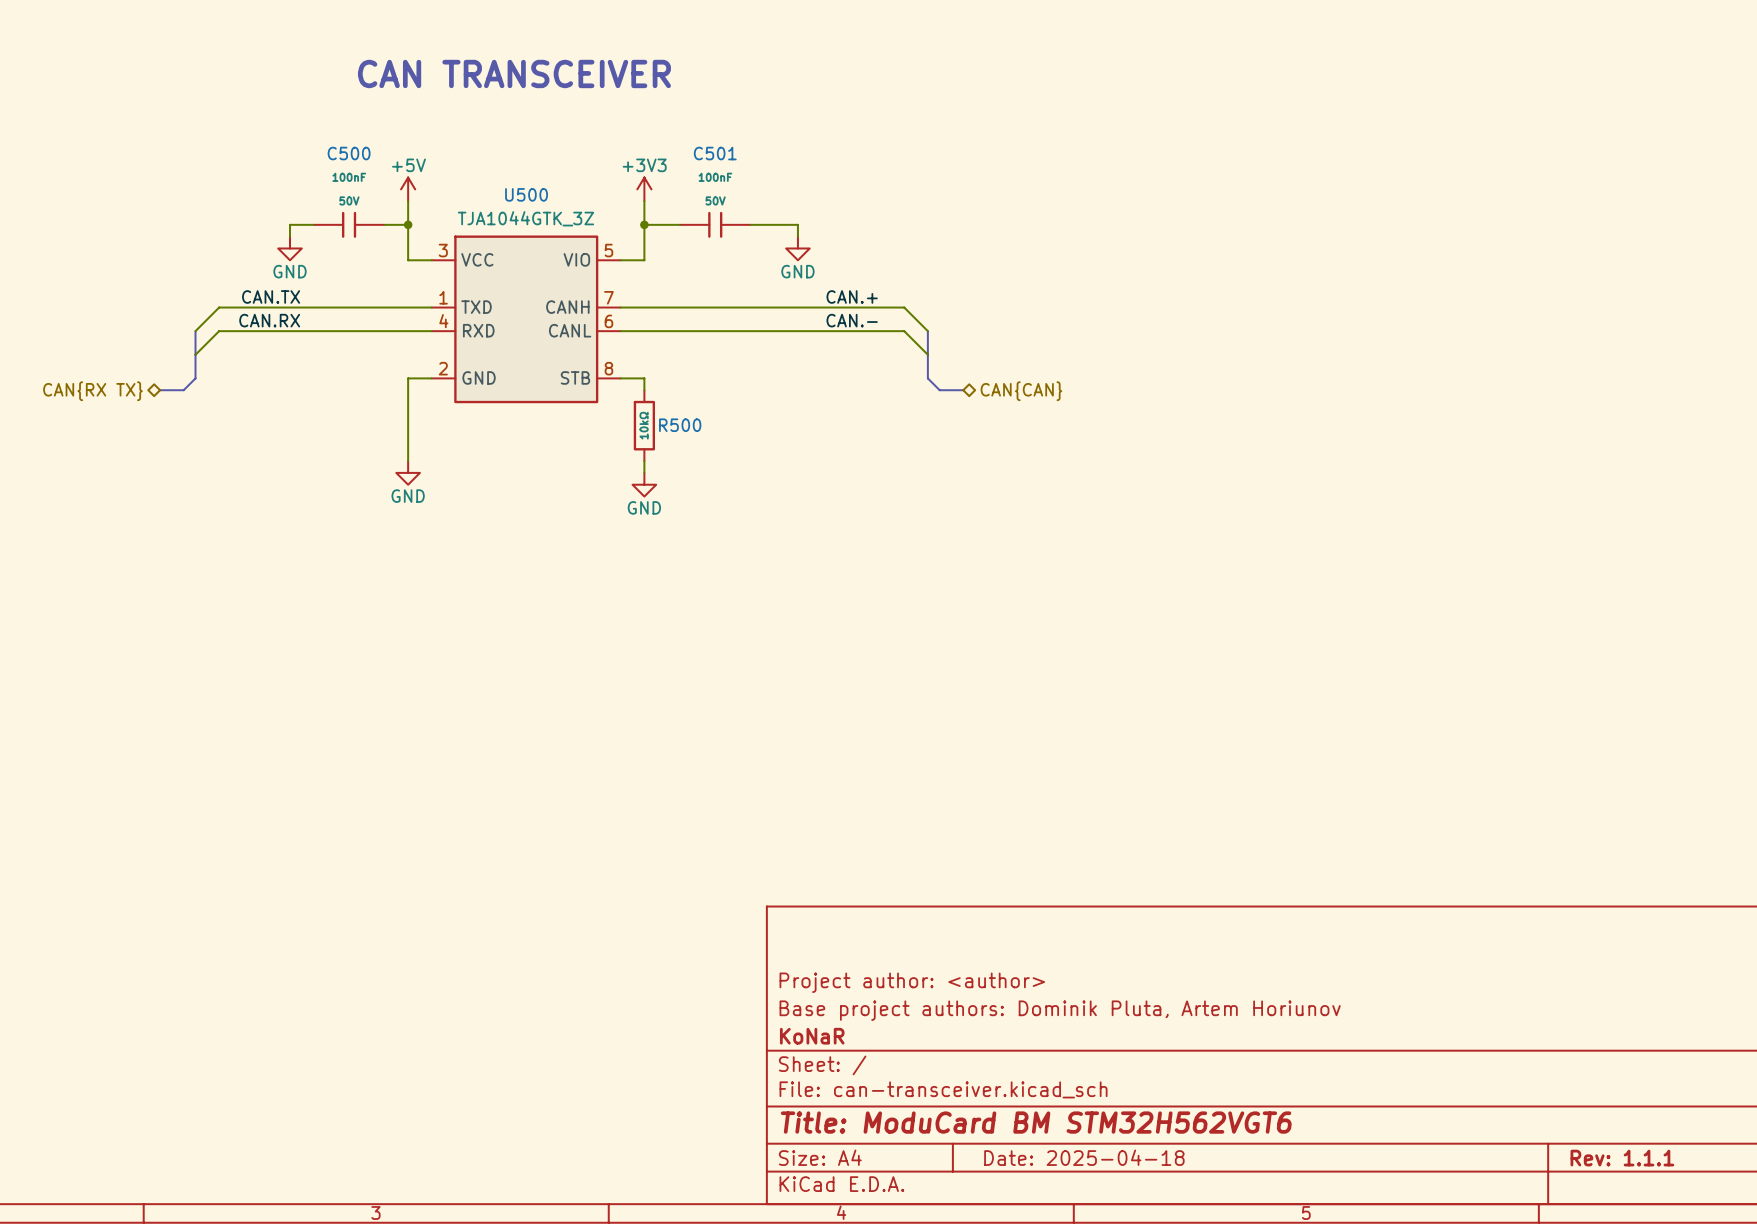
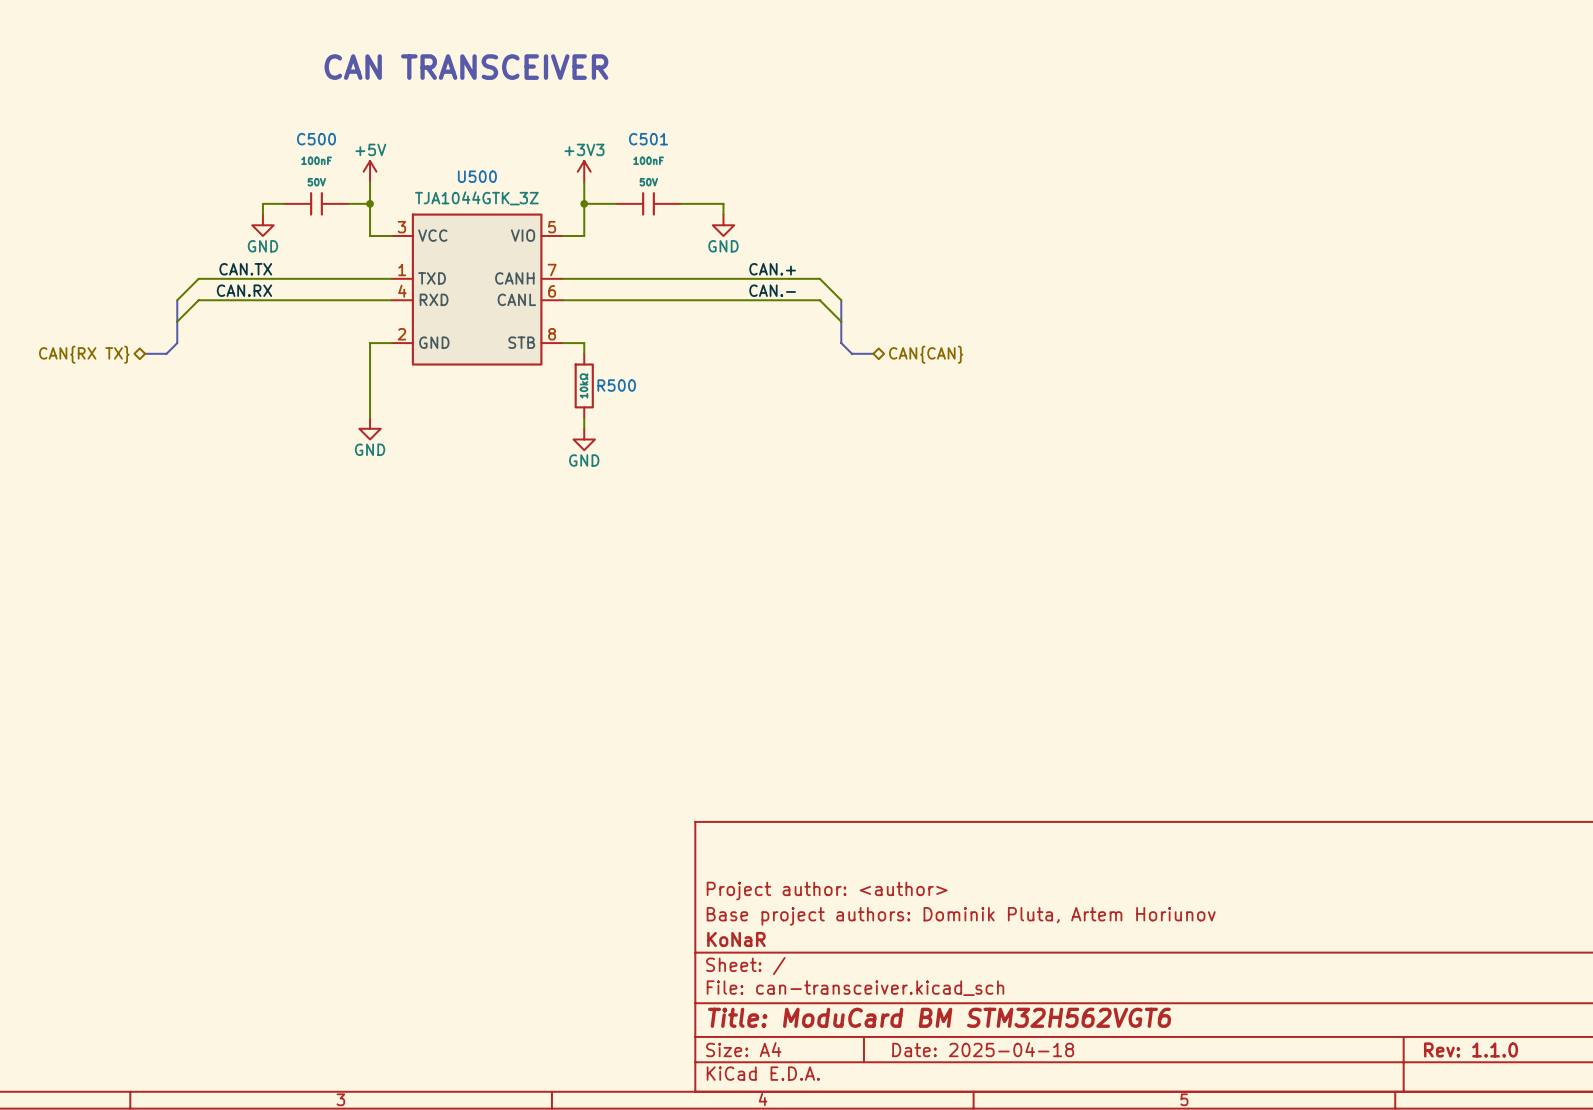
title block: Rev: 1.1.1 (1622, 1158) -> Rev: 1.1.0 (1471, 1049)

